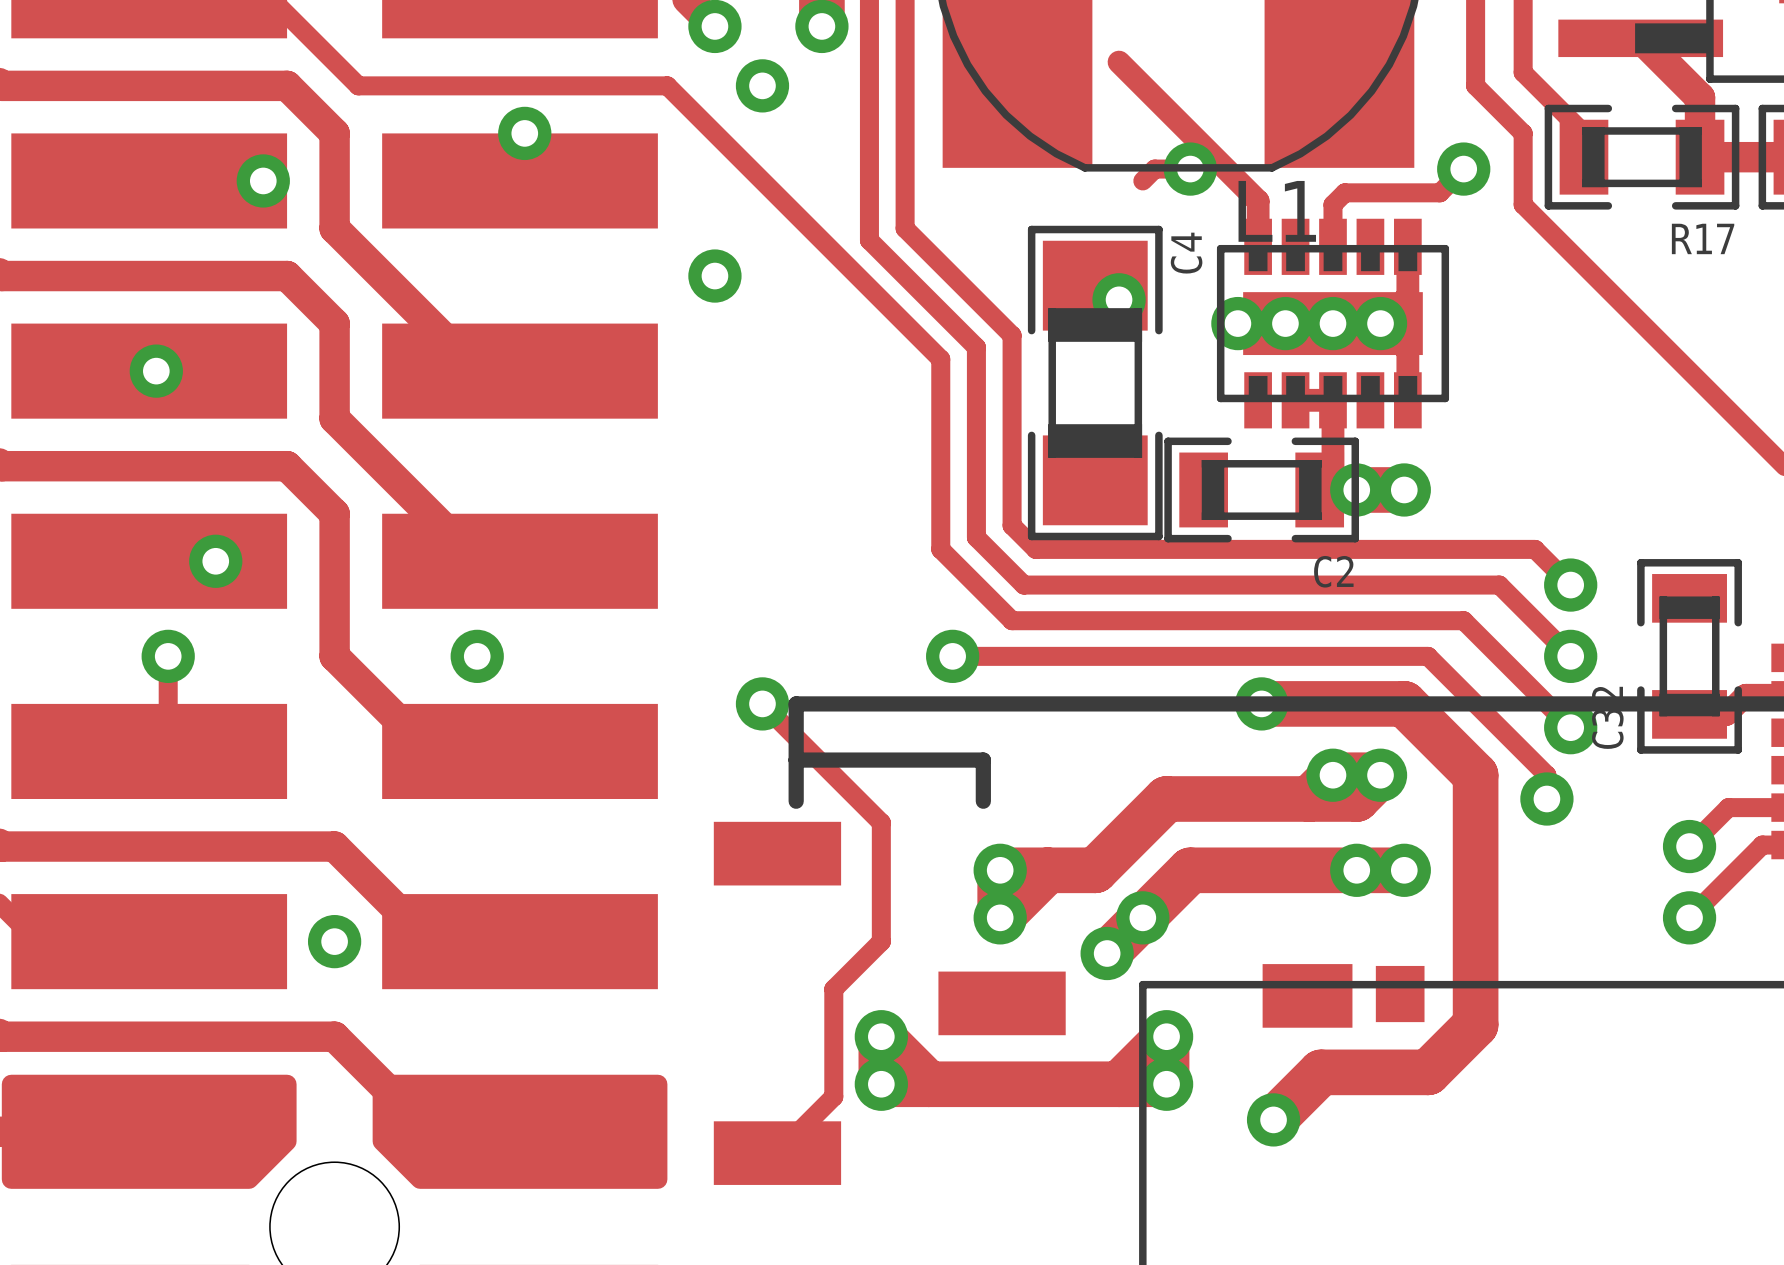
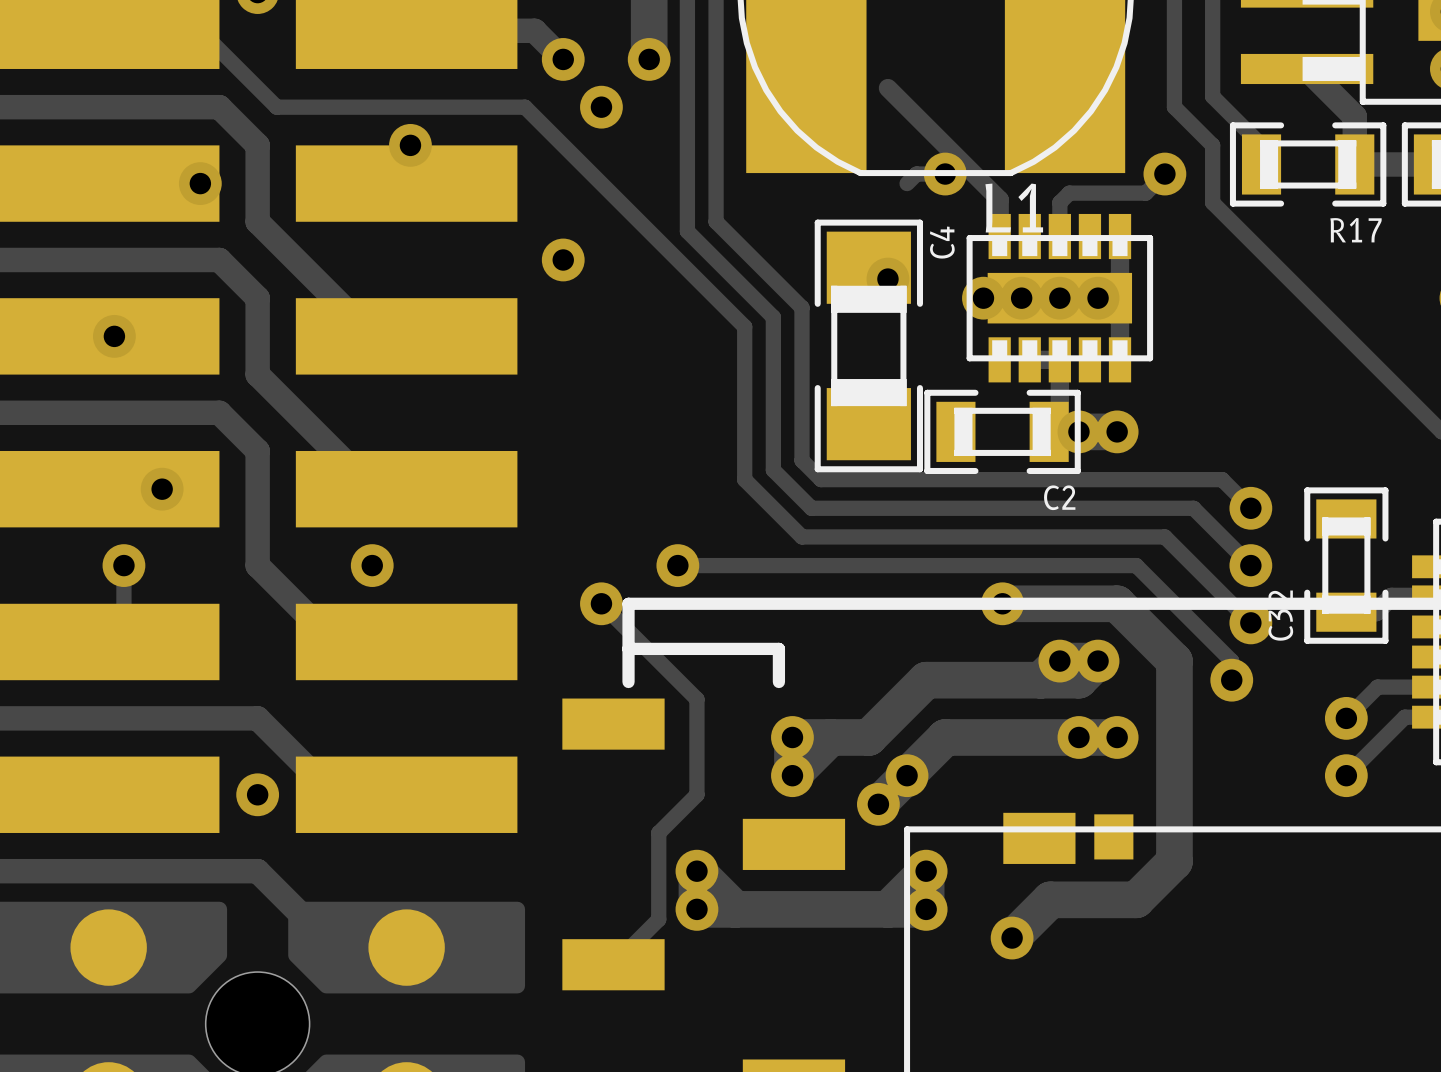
track: none -> (677, 565) (754, 565)
via position: (952, 656) -> (677, 565)

